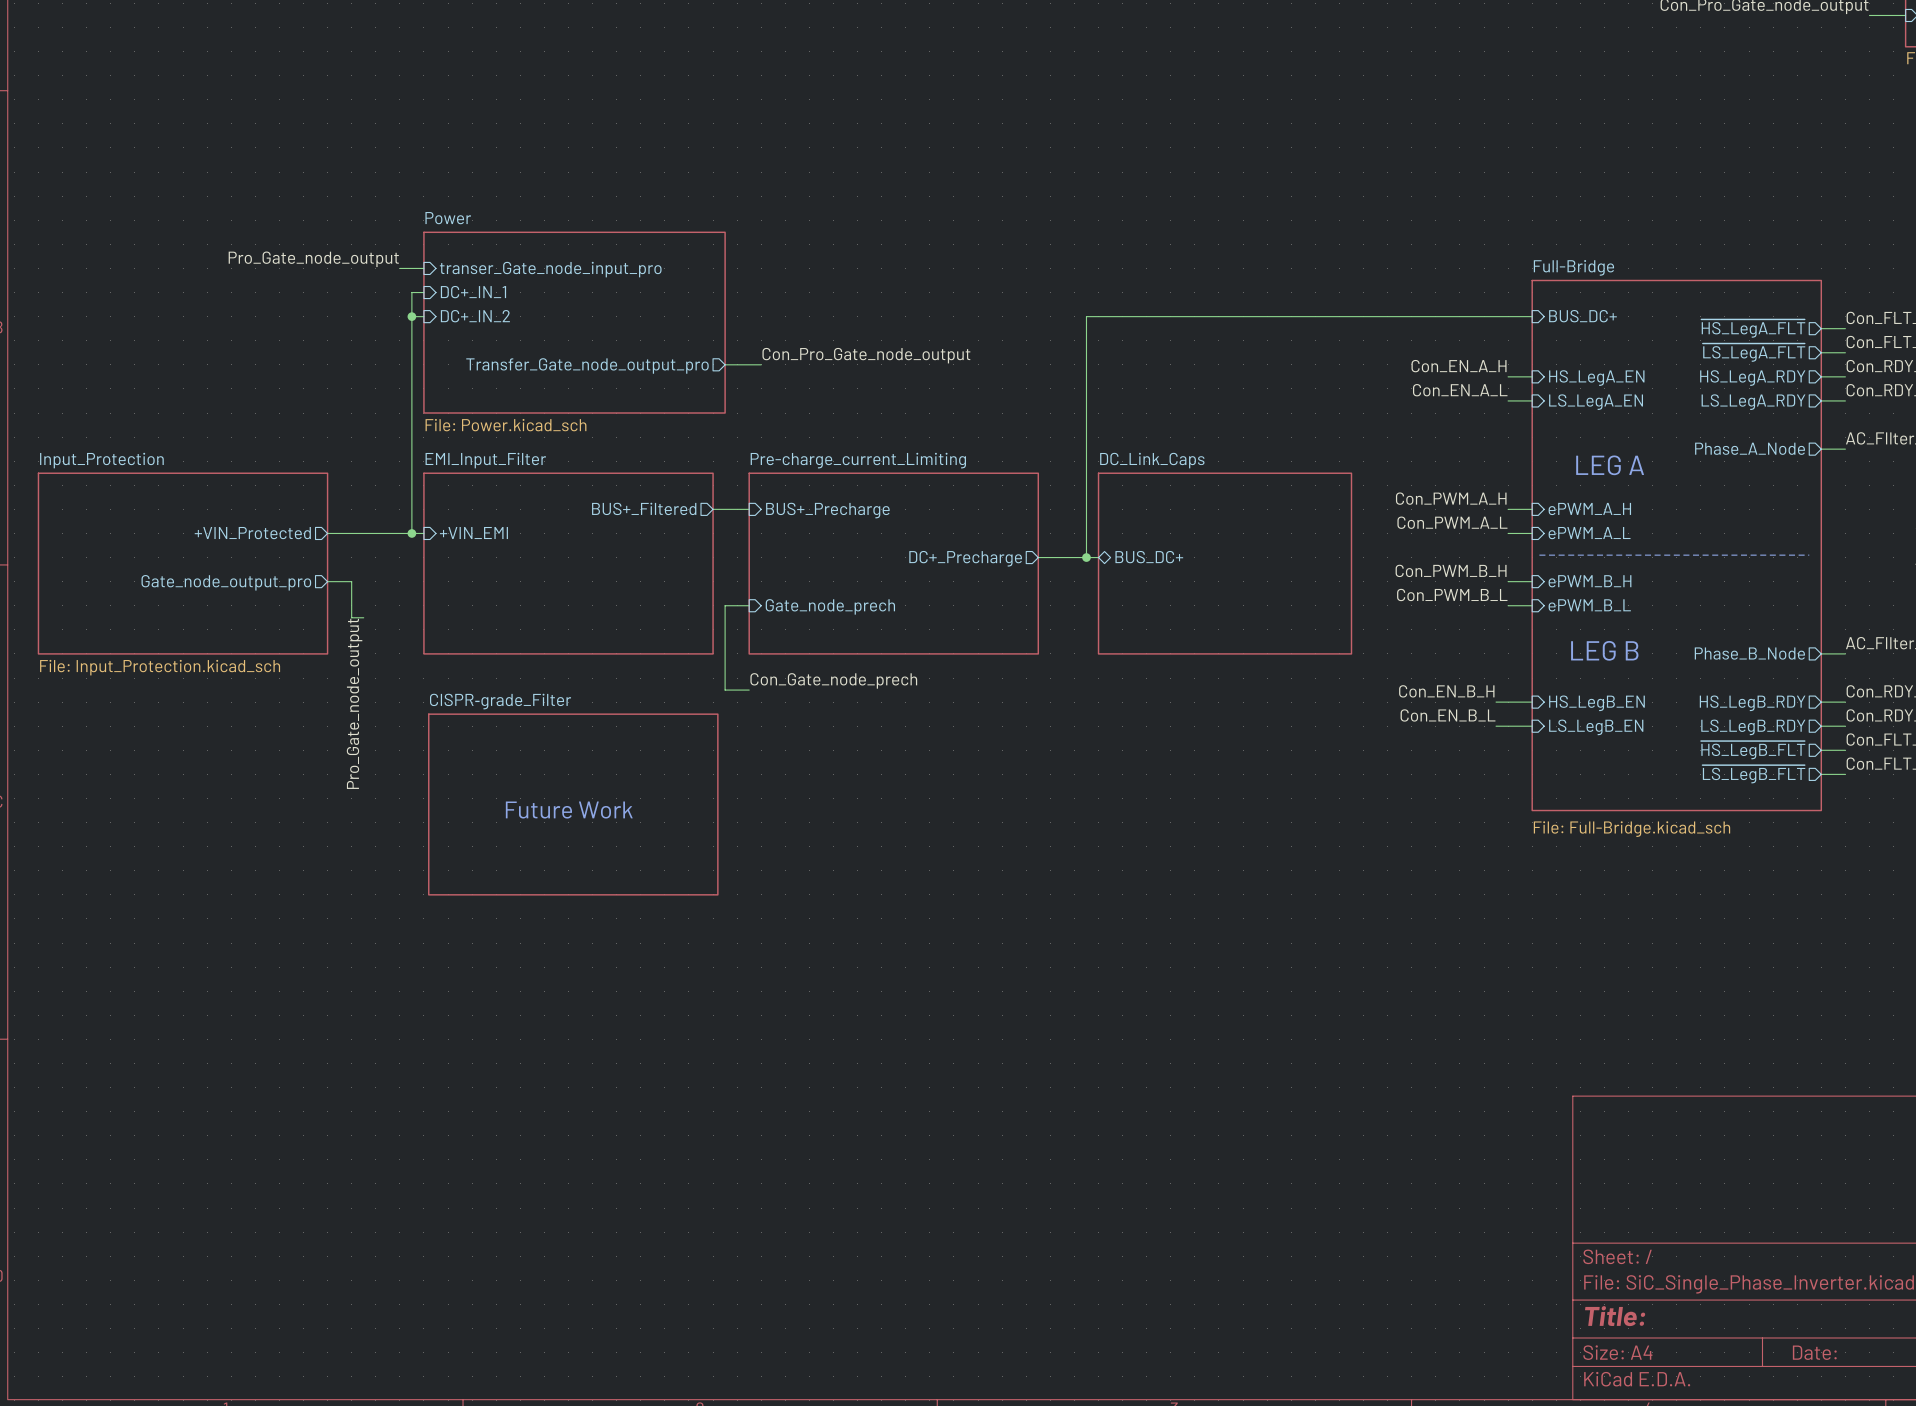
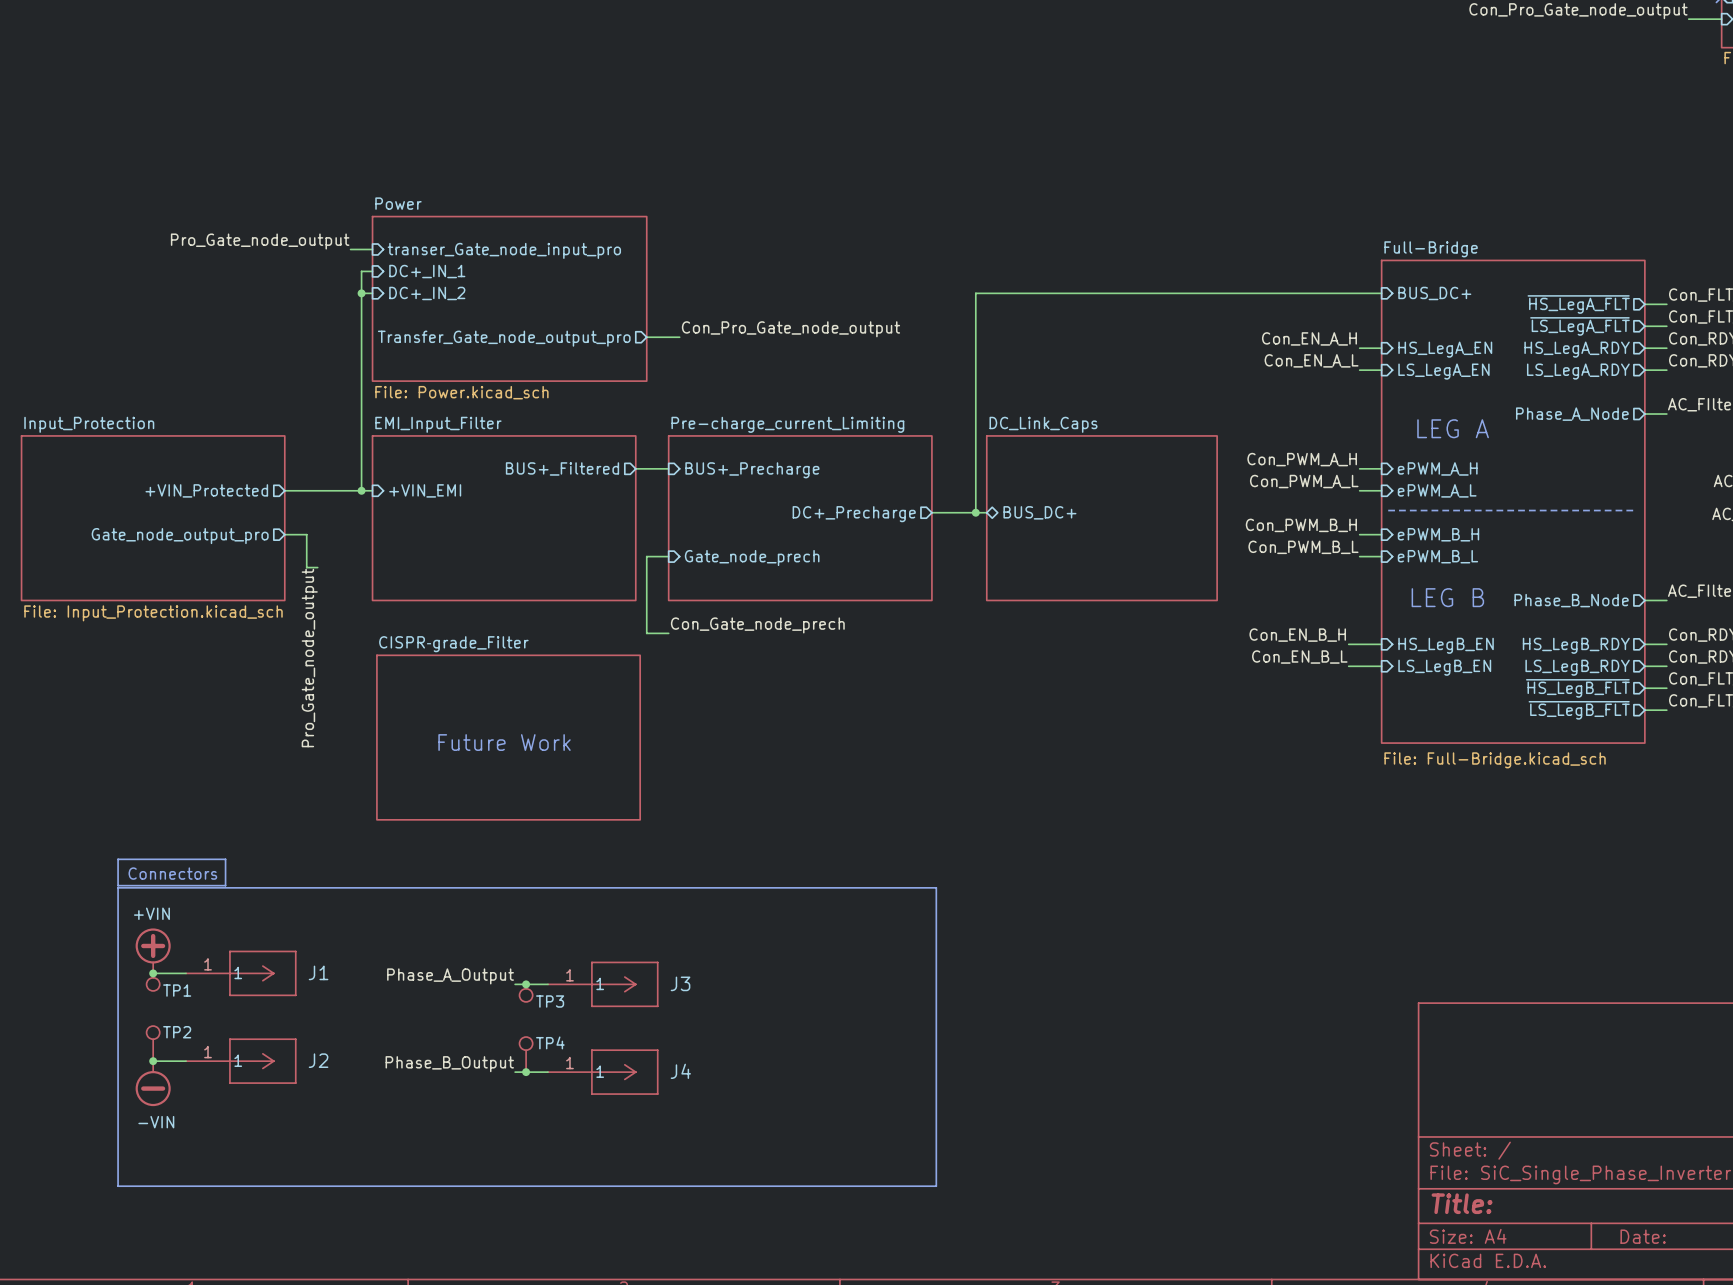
line: none -> (118, 859) (118, 885) (225, 885) (225, 859) (118, 859)
text: none -> Connectors (172, 873)
line: none -> (118, 887) (936, 887) (936, 1186) (118, 1186) (118, 887)
power symbol: none -> +VIN (153, 950)
wire: none -> (153, 973) (186, 973)
junction: none -> (153, 973)
J1: none -> (241, 973)
label: none -> Phase_A_Output (450, 976)
TP1: none -> (153, 982)
wire: none -> (515, 984) (548, 984)
junction: none -> (526, 984)
J3: none -> (603, 984)
TP3: none -> (526, 993)
TP2: none -> (153, 1043)
TP4: none -> (526, 1054)
wire: none -> (153, 1061) (186, 1061)
junction: none -> (153, 1061)
J2: none -> (241, 1061)
label: none -> Phase_B_Output (449, 1064)
wire: none -> (515, 1072) (548, 1072)
junction: none -> (526, 1072)
J4: none -> (603, 1072)
power symbol: none -> -VIN (153, 1083)

